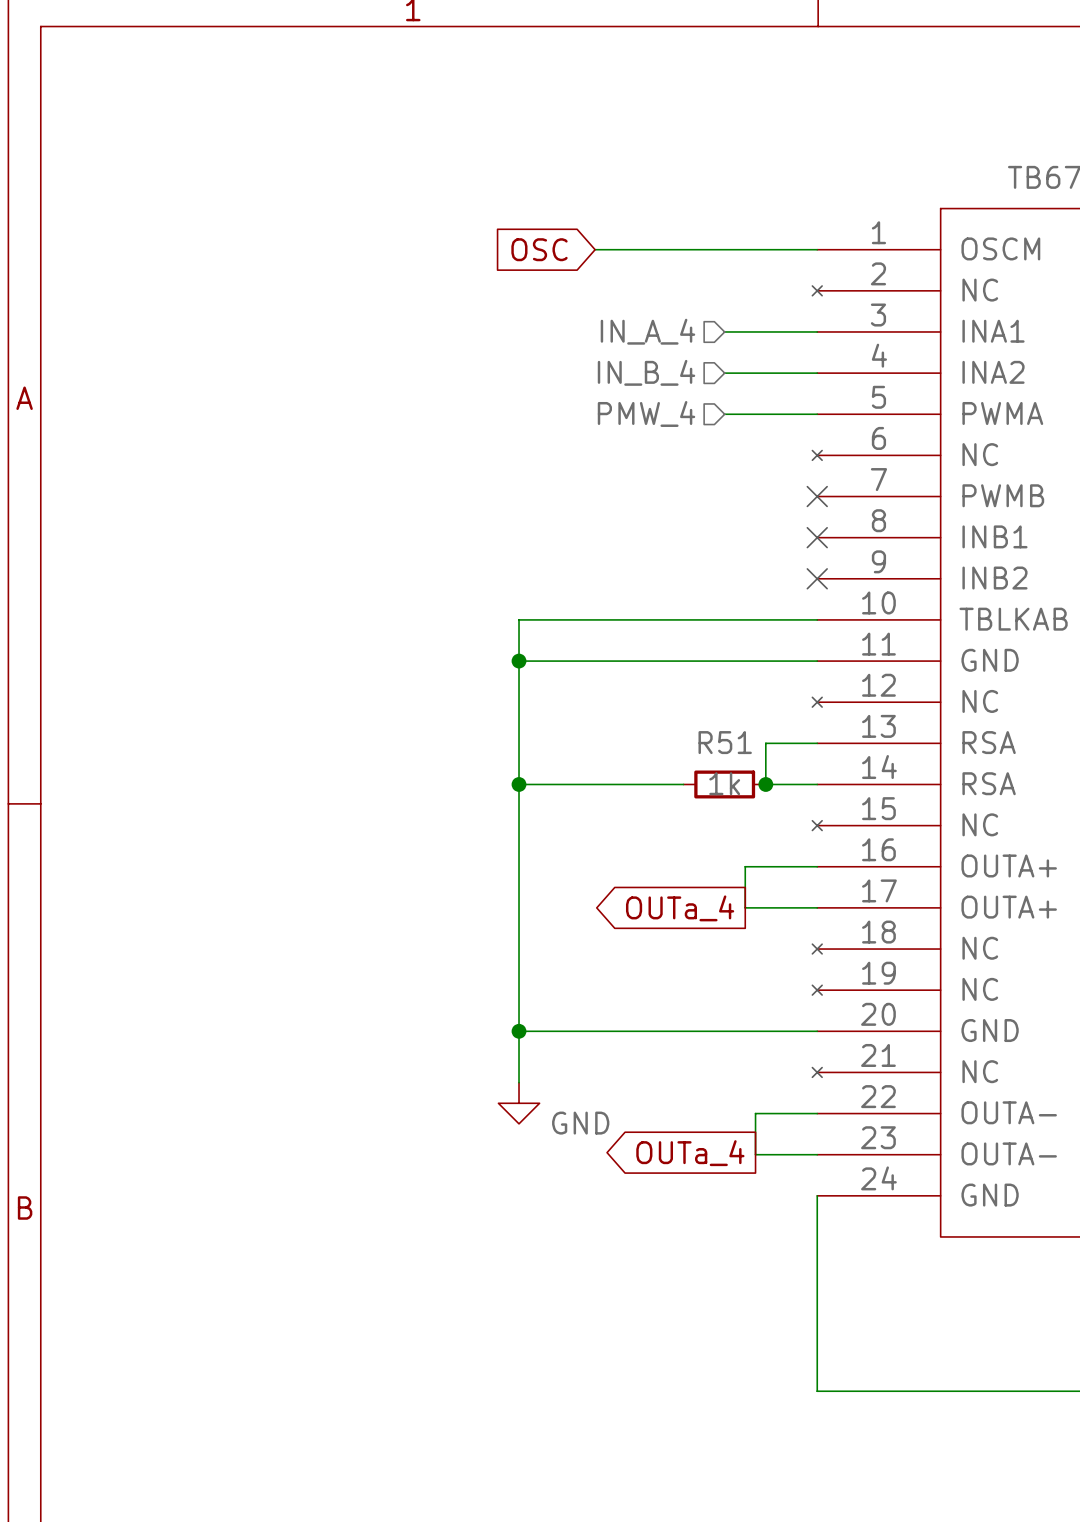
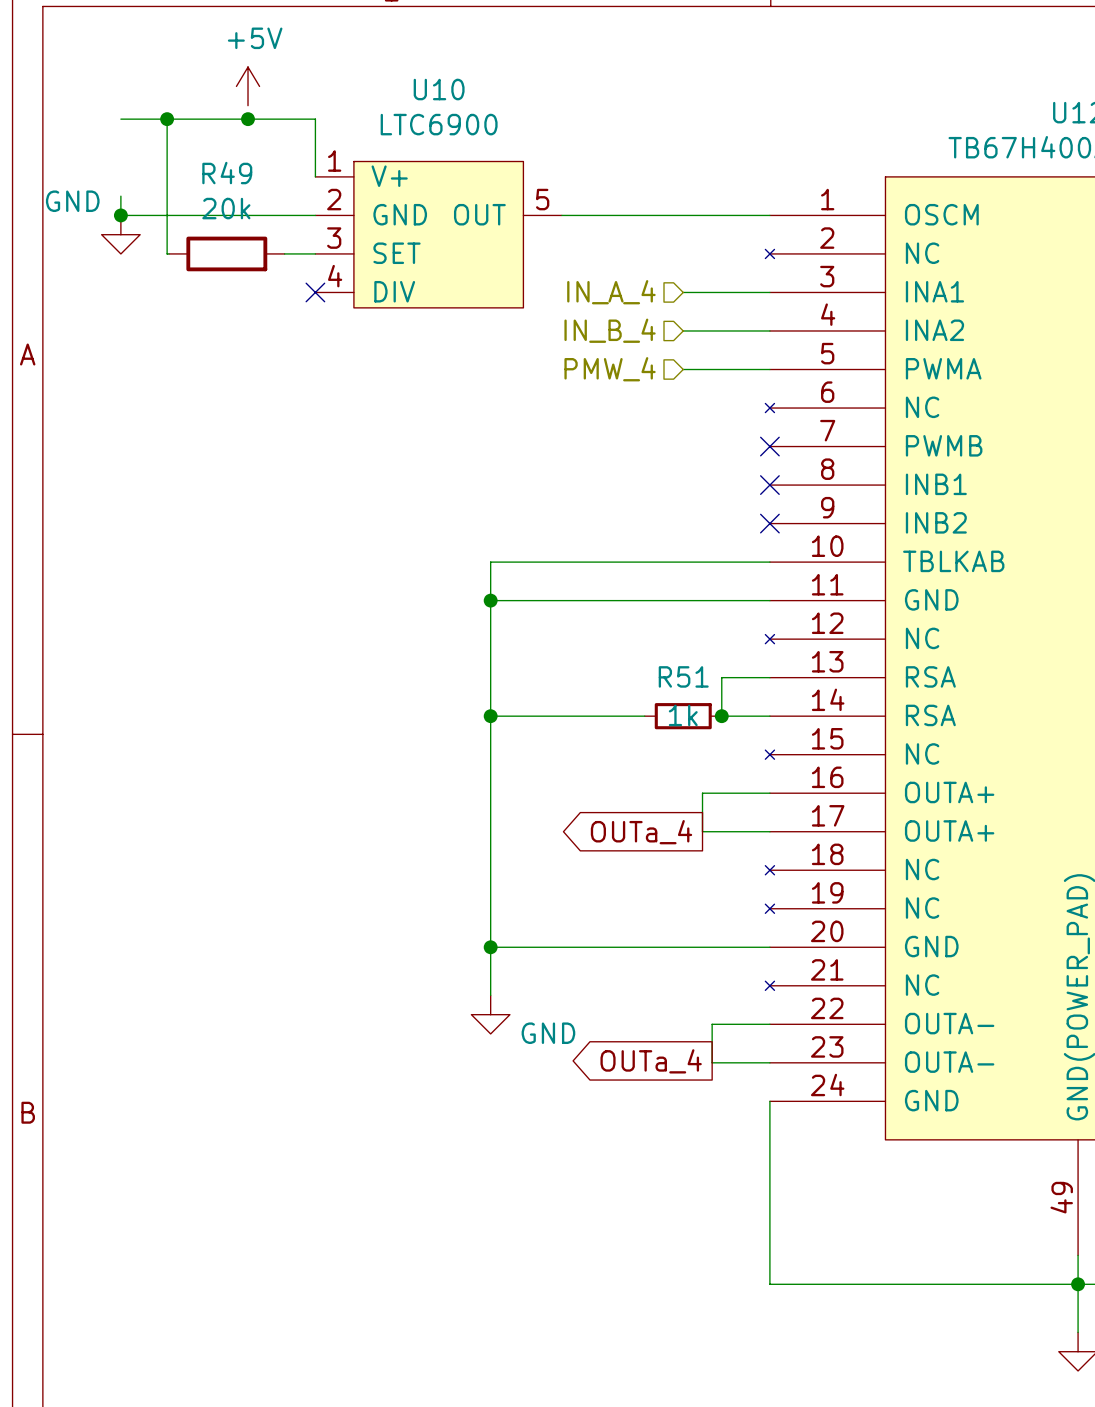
power symbol: none -> +5V (248, 86)
wire: none -> (120, 119) (315, 119) (315, 176)
wire: none -> (167, 119) (167, 253) (169, 253)
junction: none -> (167, 119)
junction: none -> (248, 119)
wire: none -> (120, 196) (120, 215) (315, 215)
junction: none -> (120, 215)
global label: OSC (539, 249) -> none
power symbol: none -> GND (120, 234)
U10: none -> LTC6900 (438, 234)
R49: none -> 20k (226, 253)
wire: none -> (284, 253) (315, 253)
no-connect mark: none -> (315, 292)

